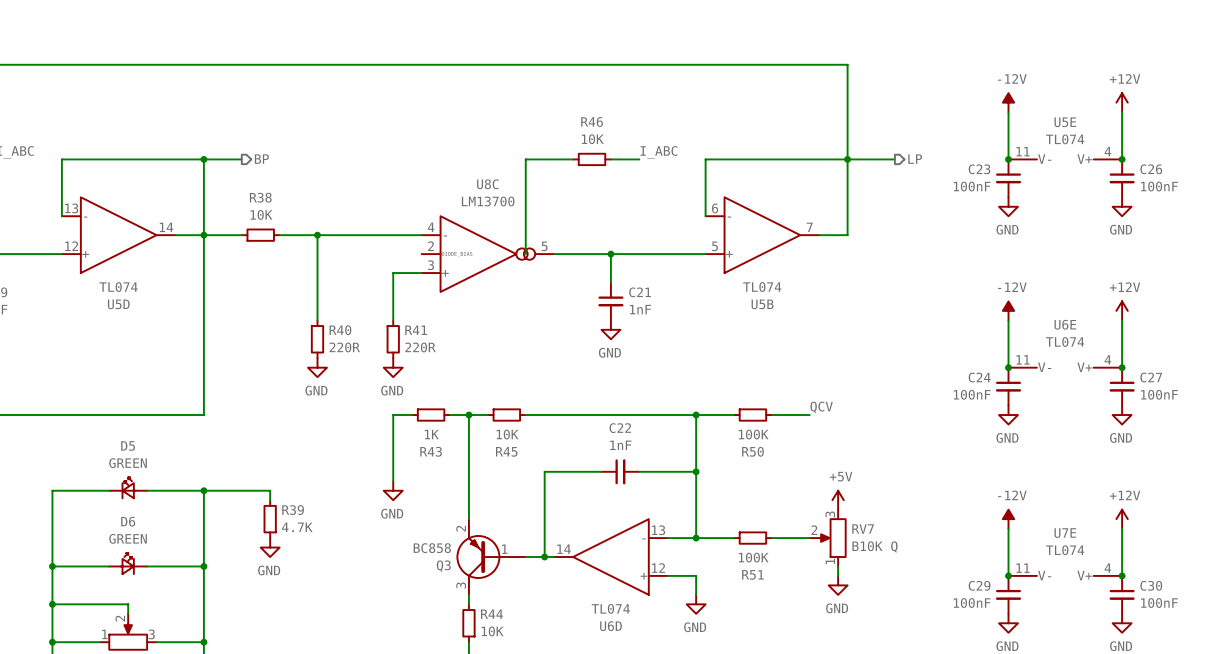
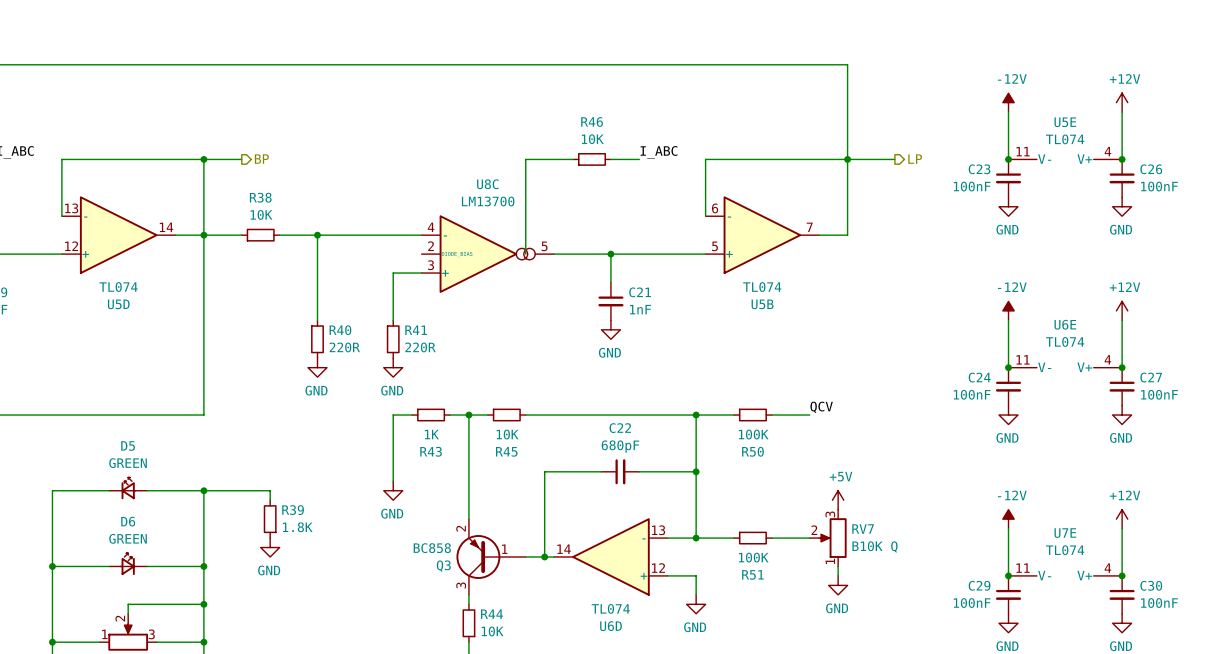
C22 value: 1nF (620, 445) -> 680pF (620, 446)
R39 value: 4.7K (297, 527) -> 1.8K (297, 527)
wire: (52, 604) (128, 604) -> (203, 604) (128, 604)
junction: (52, 604) -> none
junction: none -> (203, 604)

